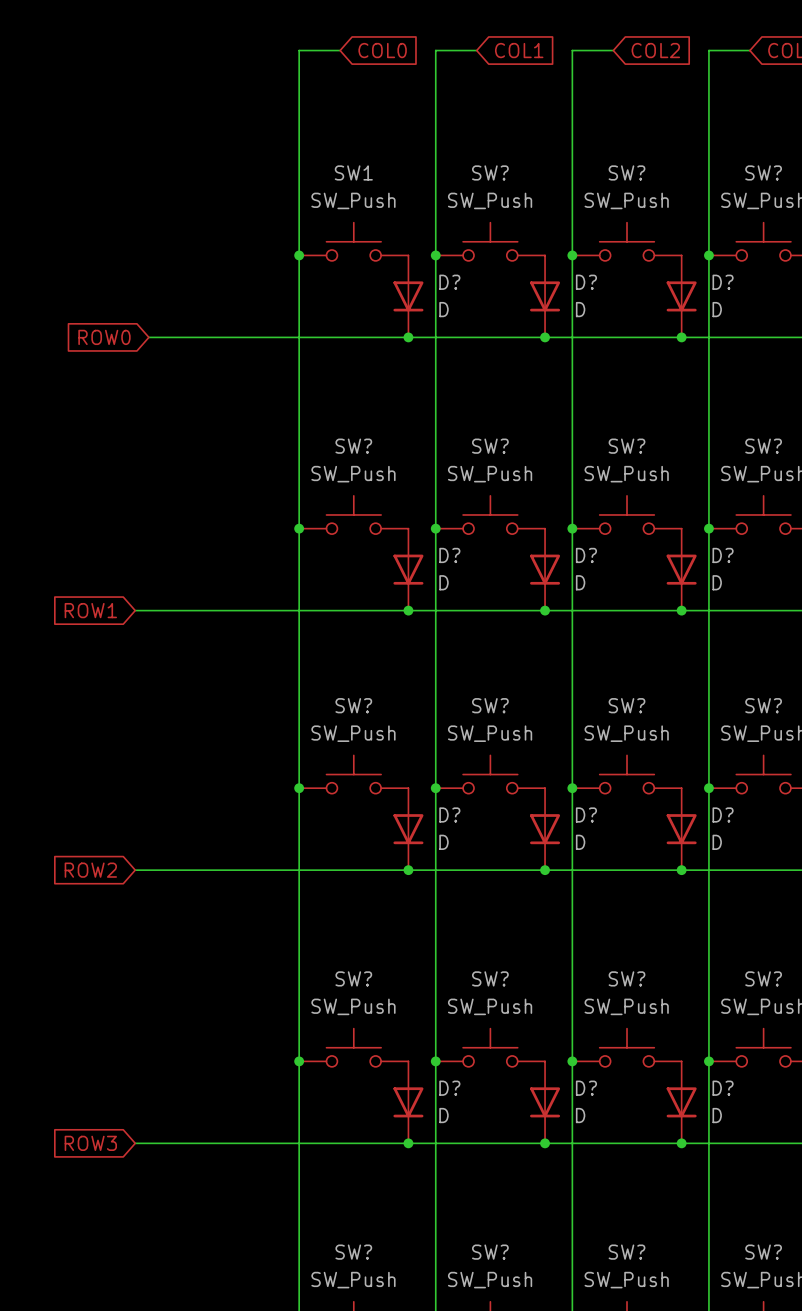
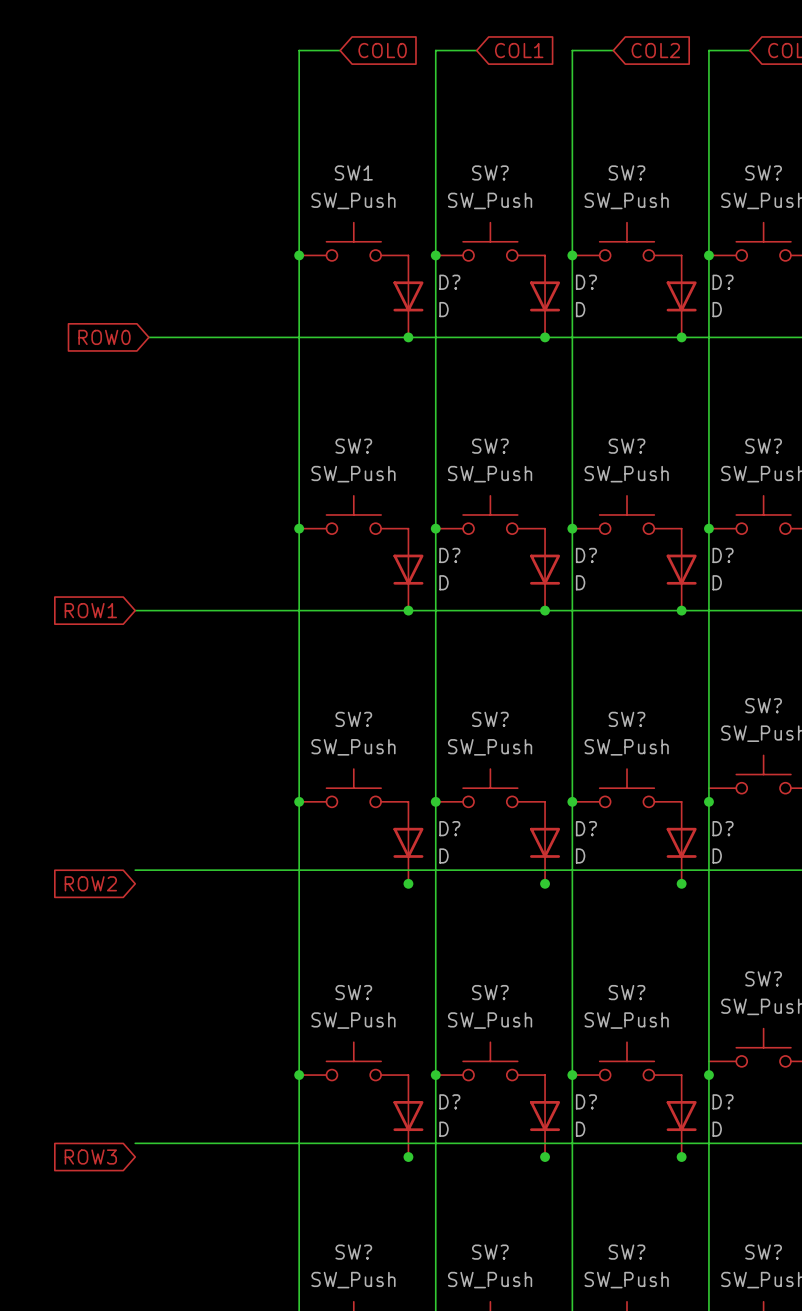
SW? position: (353, 774) -> (353, 788)
SW? position: (490, 774) -> (490, 788)
SW? position: (627, 774) -> (627, 788)
junction position: (299, 788) -> (299, 801)
junction position: (435, 788) -> (435, 801)
junction position: (572, 788) -> (572, 801)
junction position: (708, 788) -> (708, 801)
D? position: (408, 829) -> (408, 842)
D? position: (545, 829) -> (545, 842)
D? position: (681, 829) -> (681, 842)
global label position: ROW2 (90, 870) -> ROW2 (90, 883)
junction position: (408, 870) -> (408, 883)
junction position: (545, 870) -> (545, 883)
junction position: (681, 870) -> (681, 883)
SW? position: (353, 1047) -> (353, 1061)
SW? position: (490, 1047) -> (490, 1061)
SW? position: (627, 1047) -> (627, 1061)
junction position: (299, 1061) -> (299, 1075)
junction position: (435, 1061) -> (435, 1075)
junction position: (572, 1061) -> (572, 1075)
junction position: (708, 1061) -> (708, 1075)
D? position: (408, 1102) -> (408, 1116)
D? position: (545, 1102) -> (545, 1116)
D? position: (681, 1102) -> (681, 1116)
global label position: ROW3 (90, 1143) -> ROW3 (90, 1157)
junction position: (408, 1143) -> (408, 1157)
junction position: (545, 1143) -> (545, 1157)
junction position: (681, 1143) -> (681, 1157)

